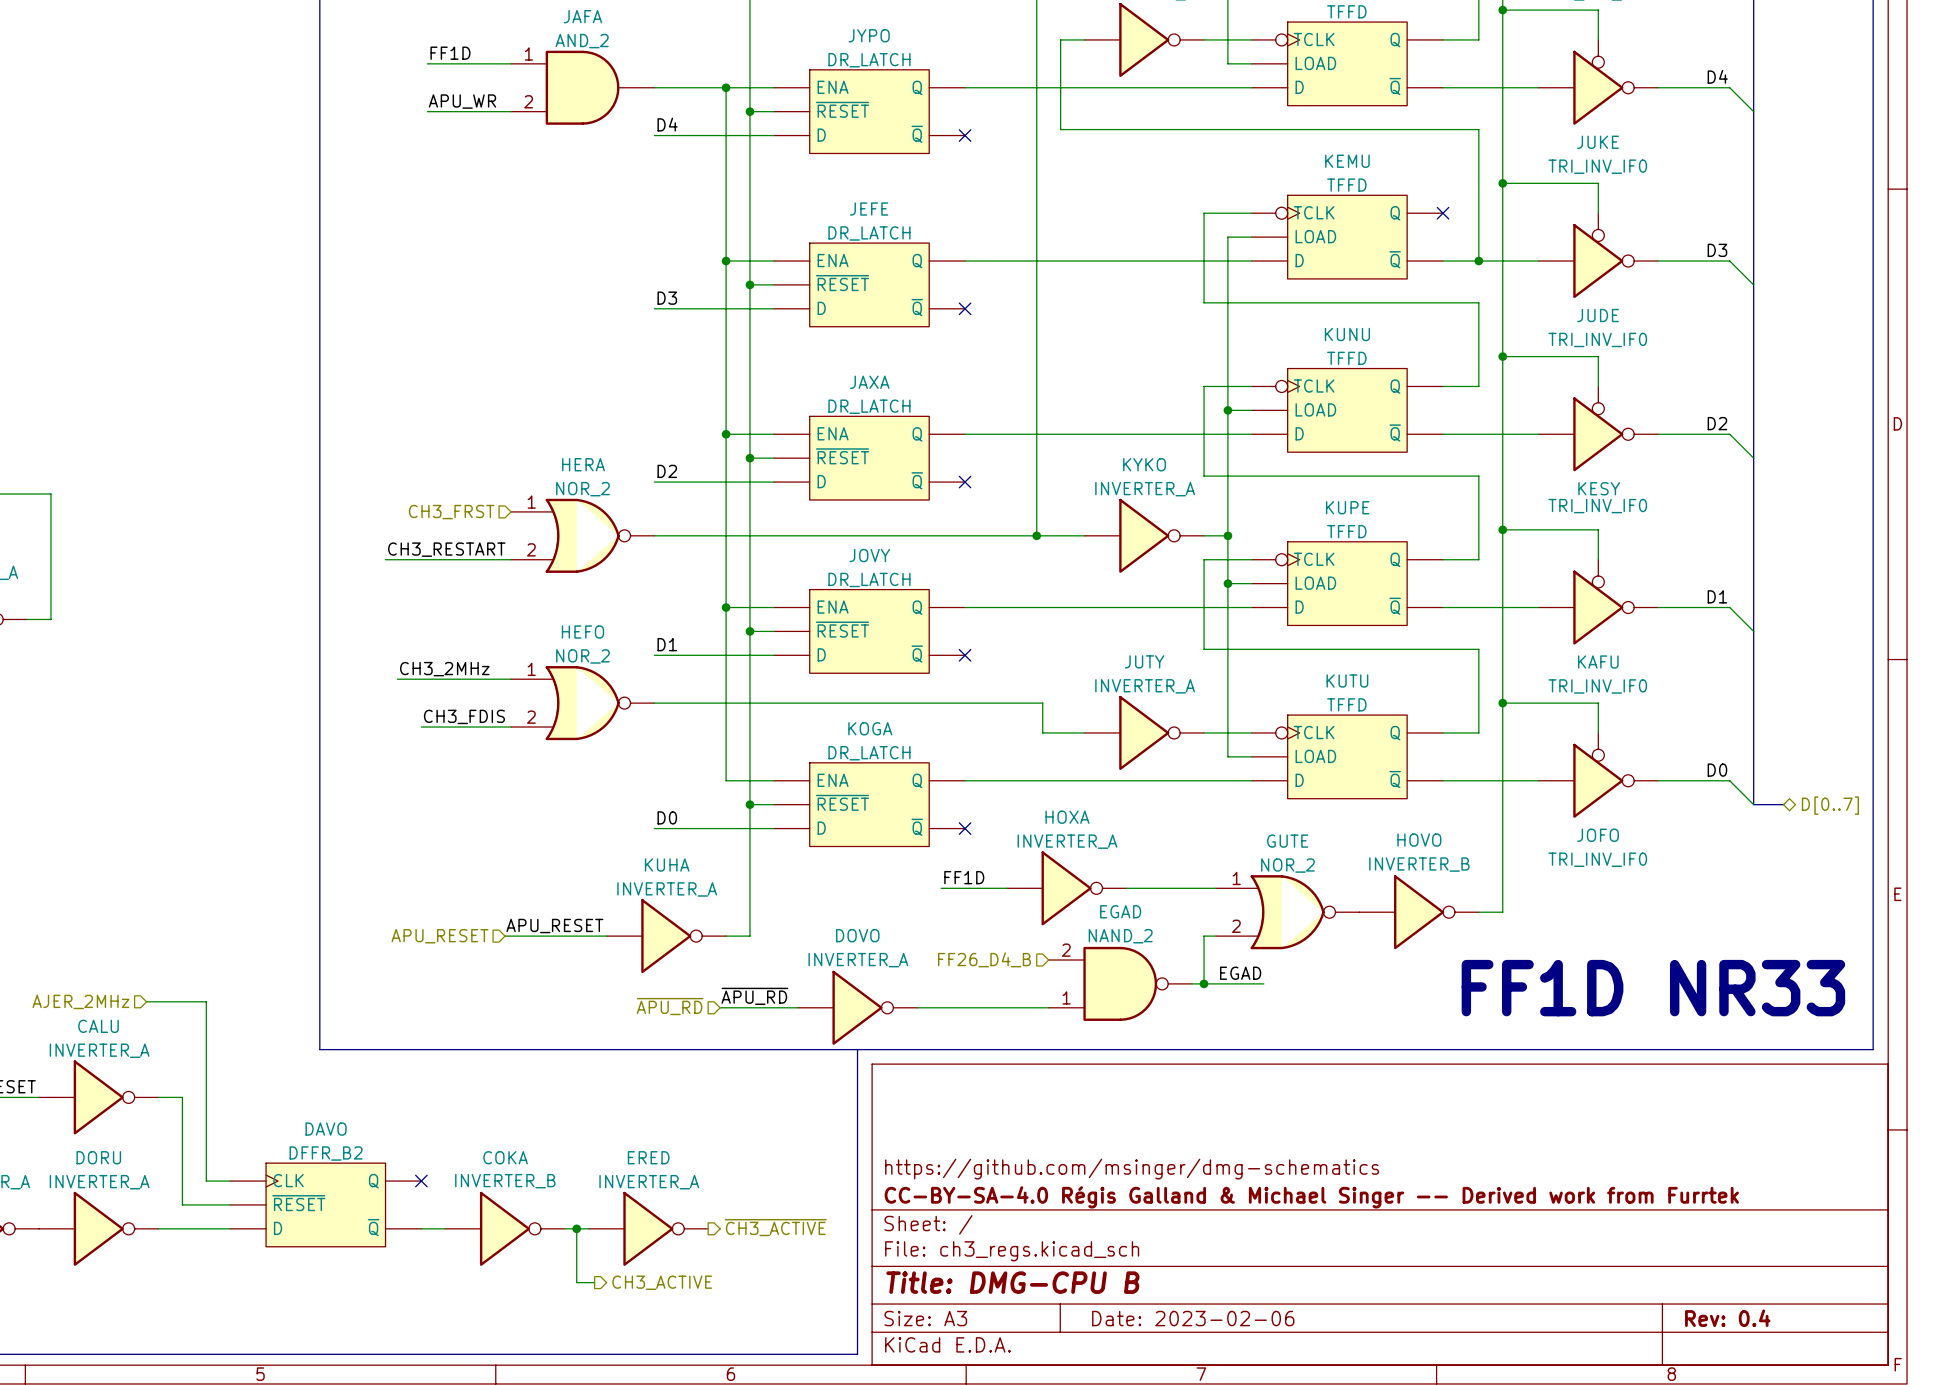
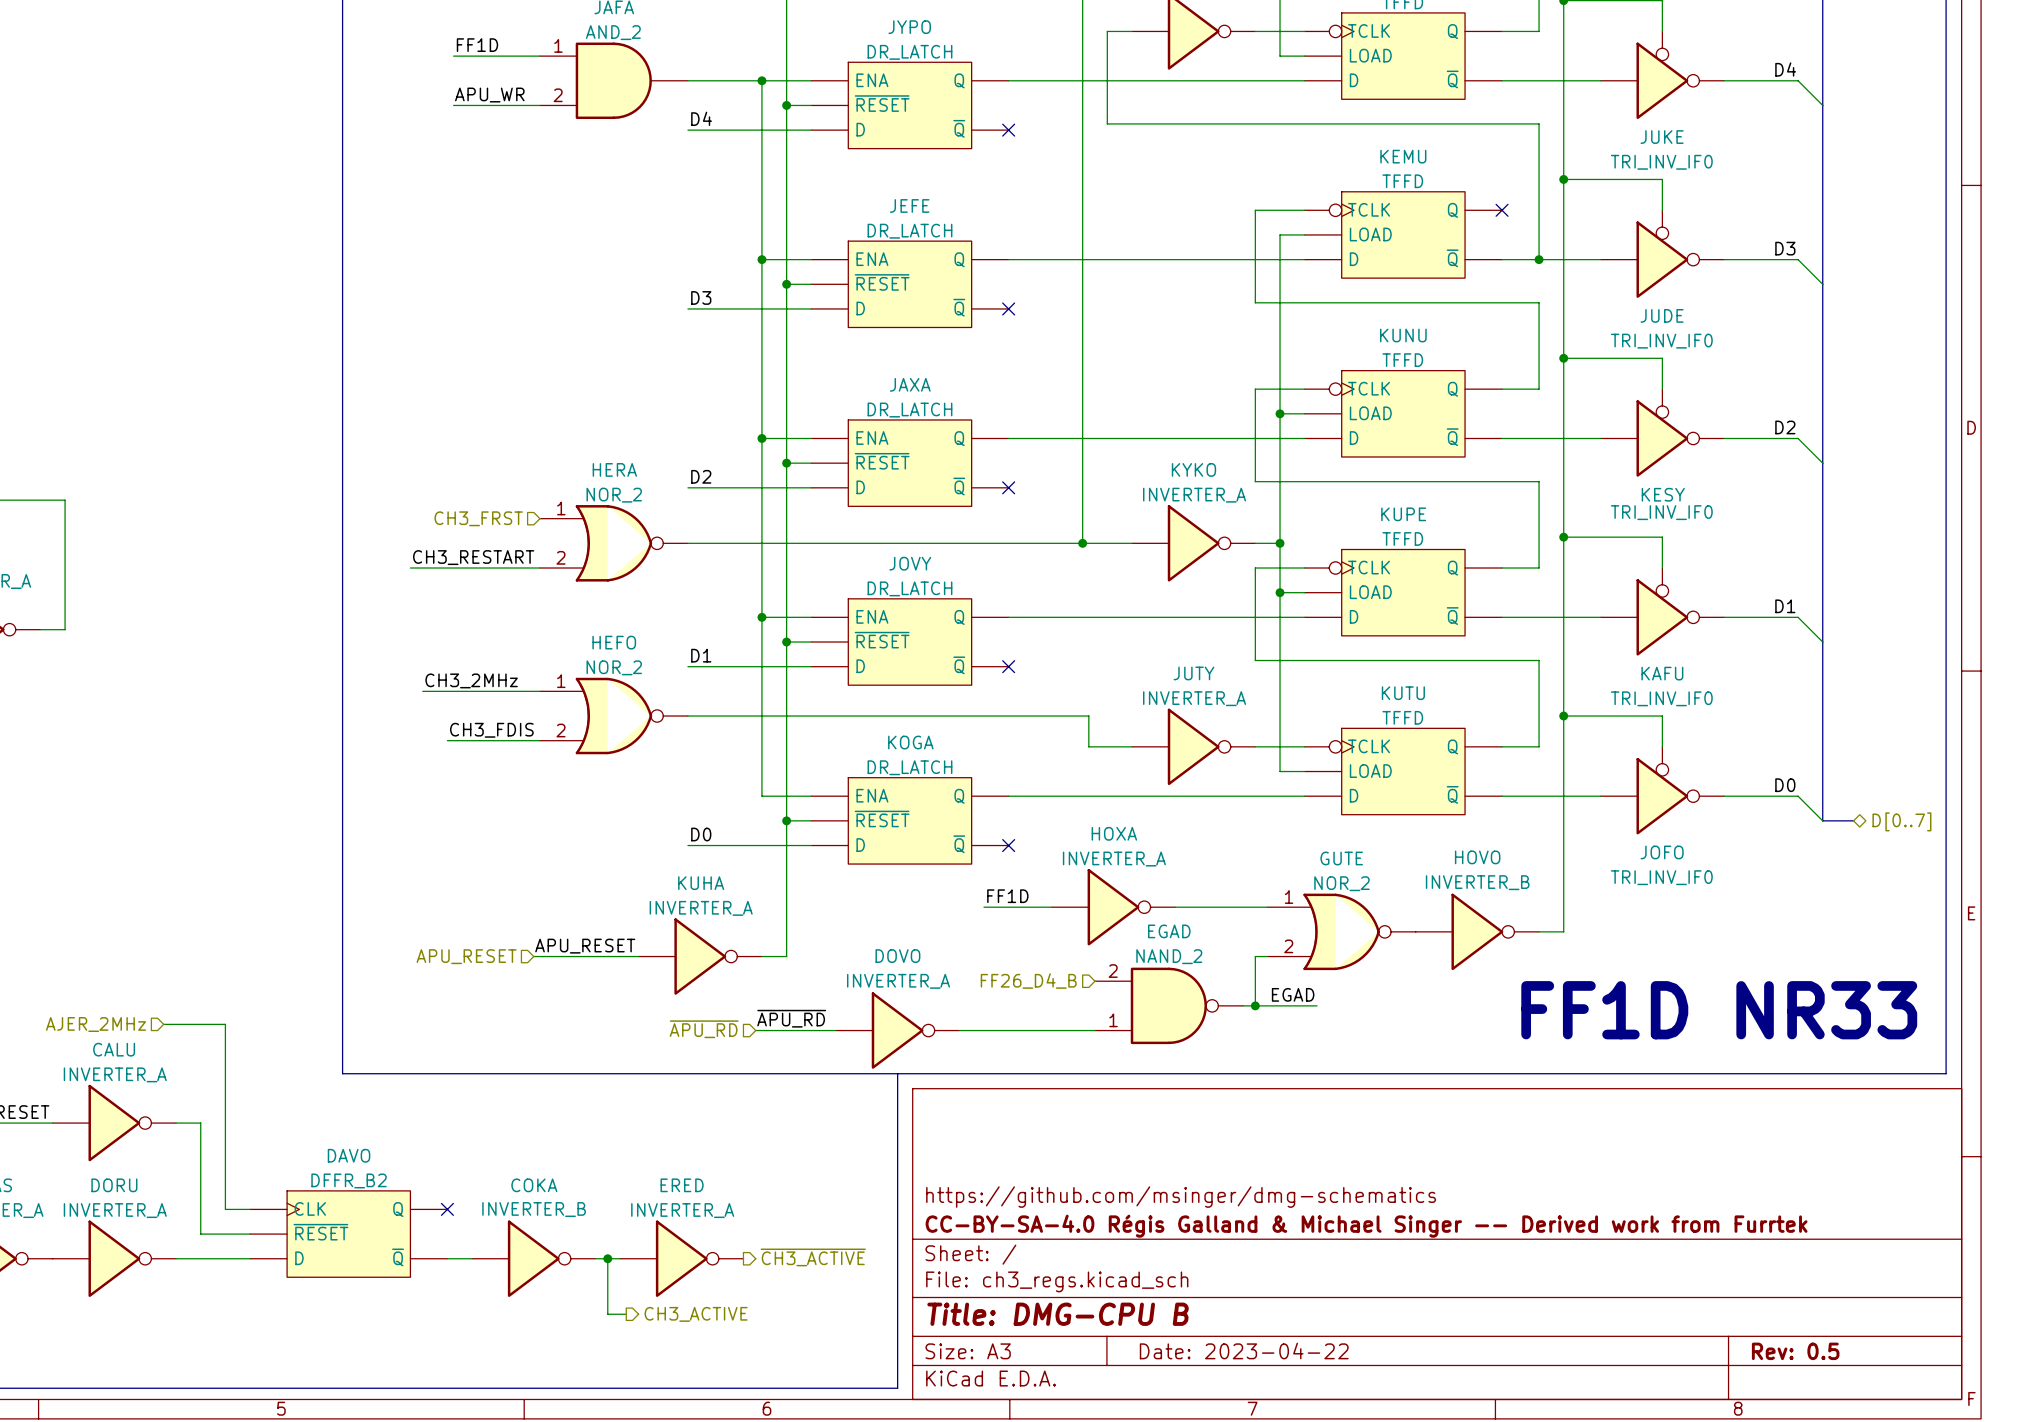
title block: Date: 2023-02-06 (1193, 1318) -> Date: 2023-04-22 (1244, 1350)
title block: Rev: 0.4 (1727, 1318) -> Rev: 0.5 (1795, 1351)

